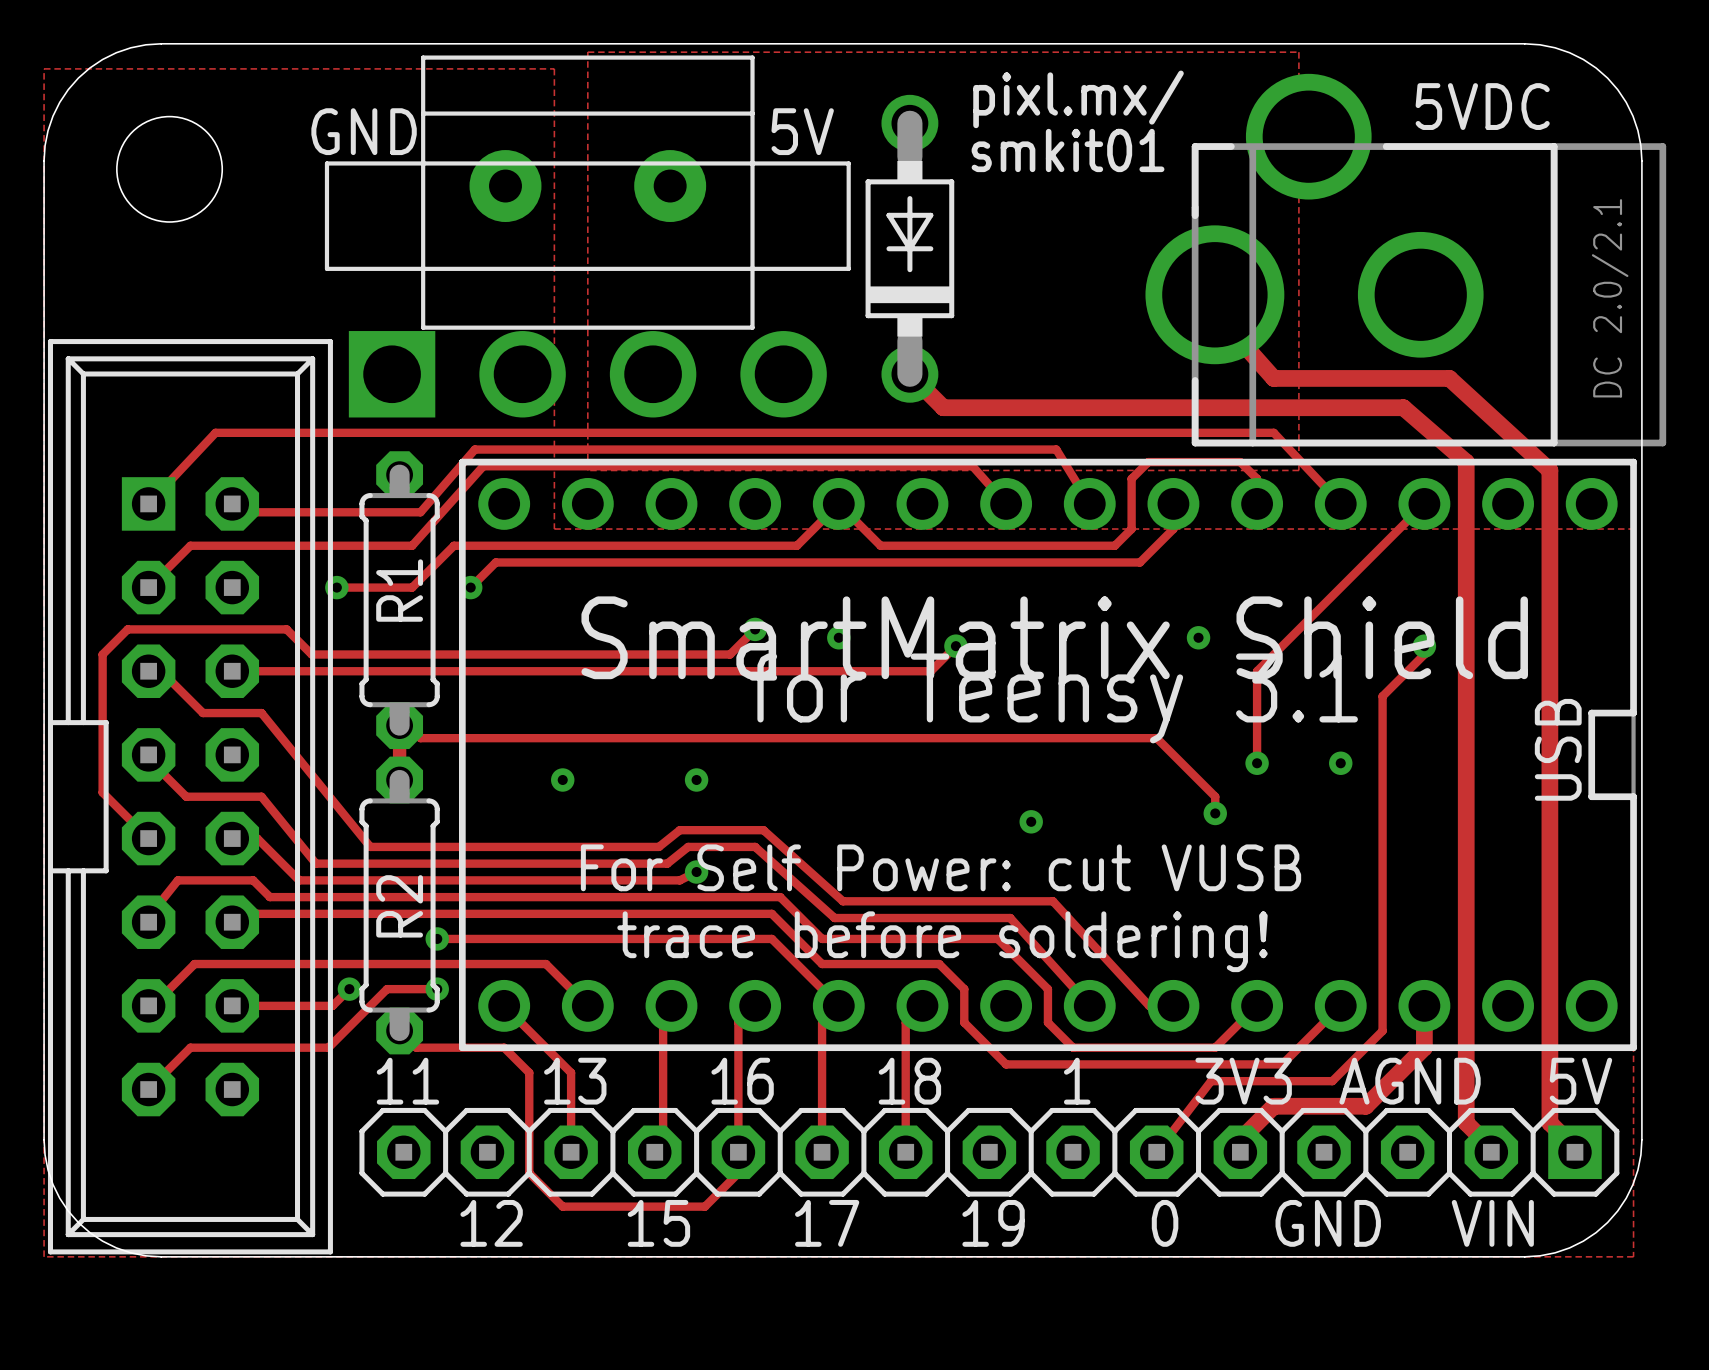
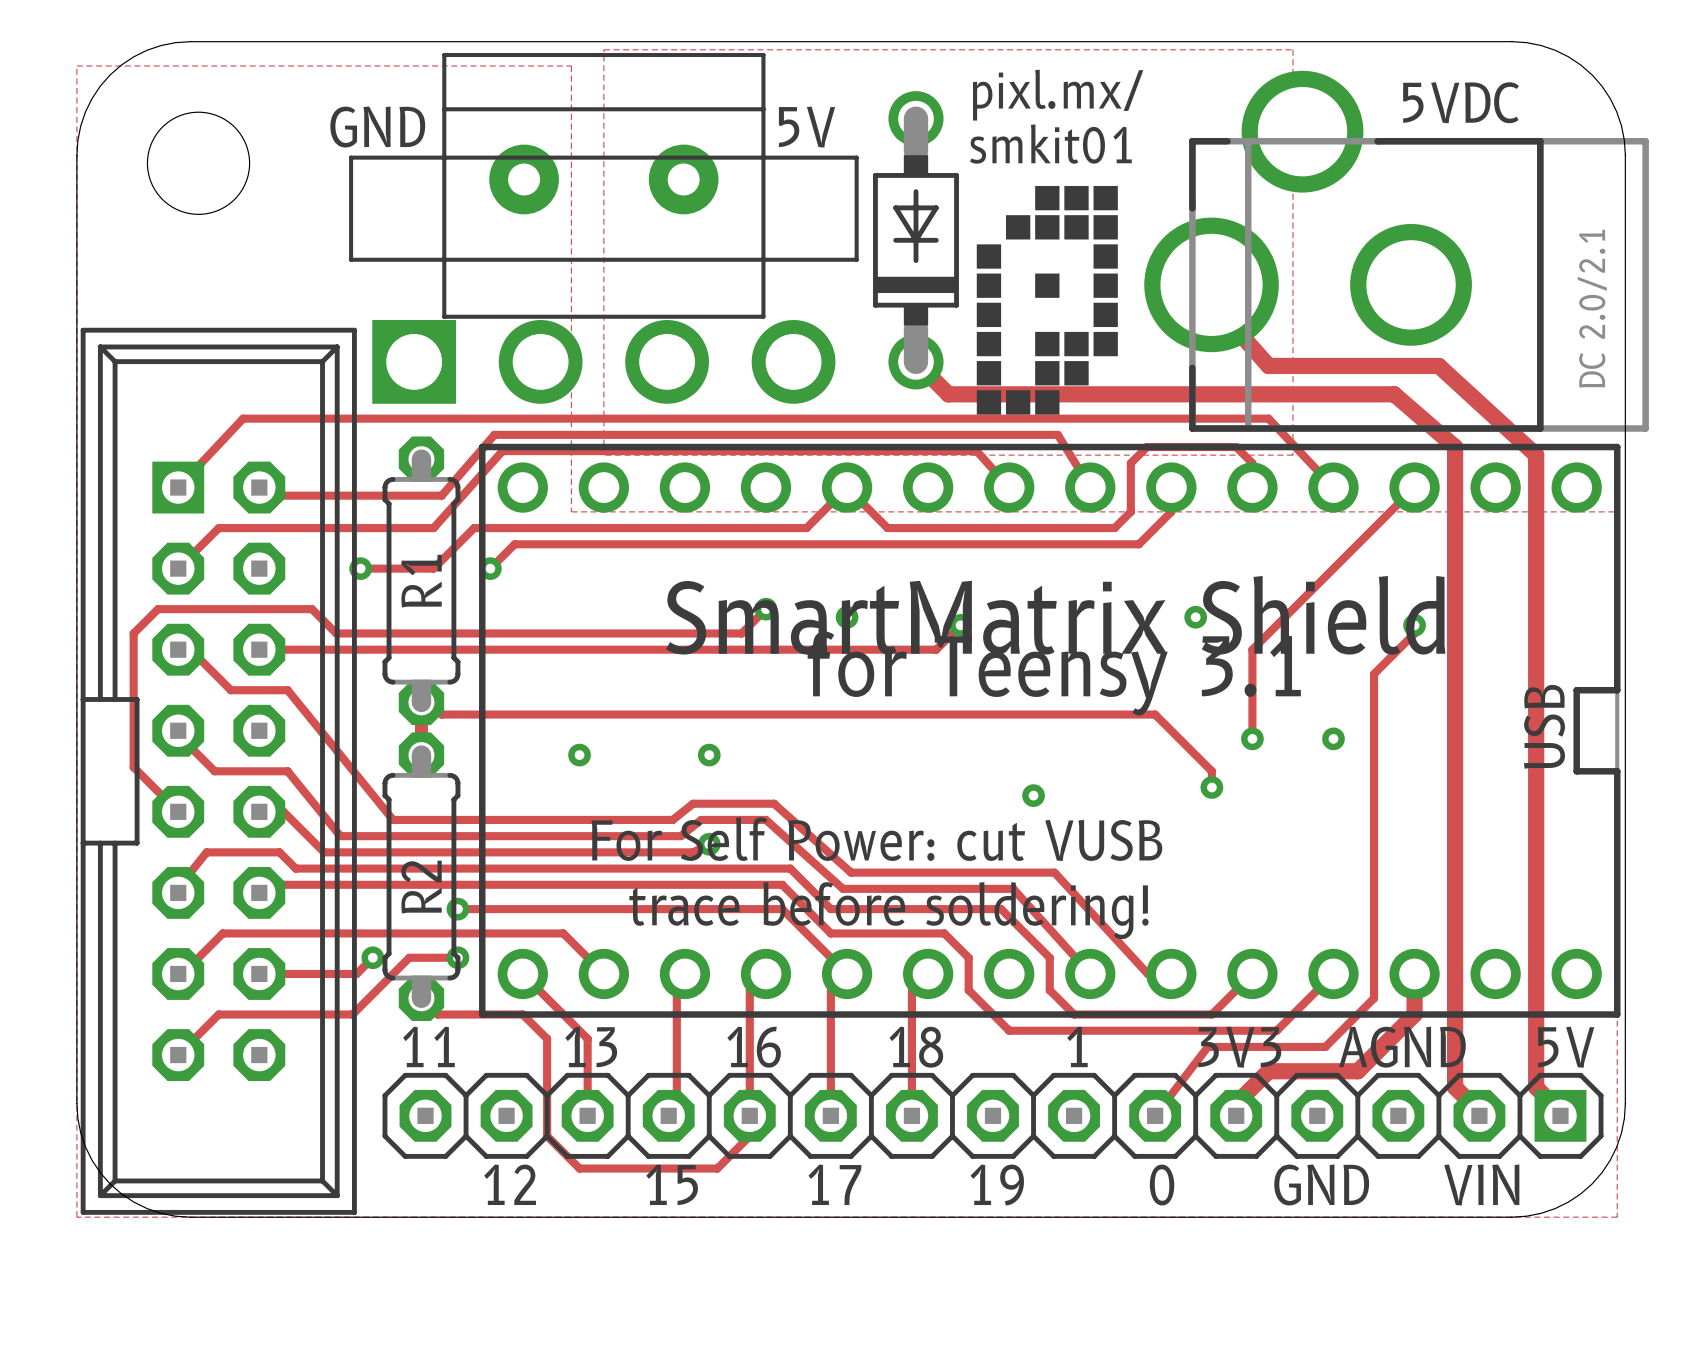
drawing: none -> [976, 185, 1118, 415]

